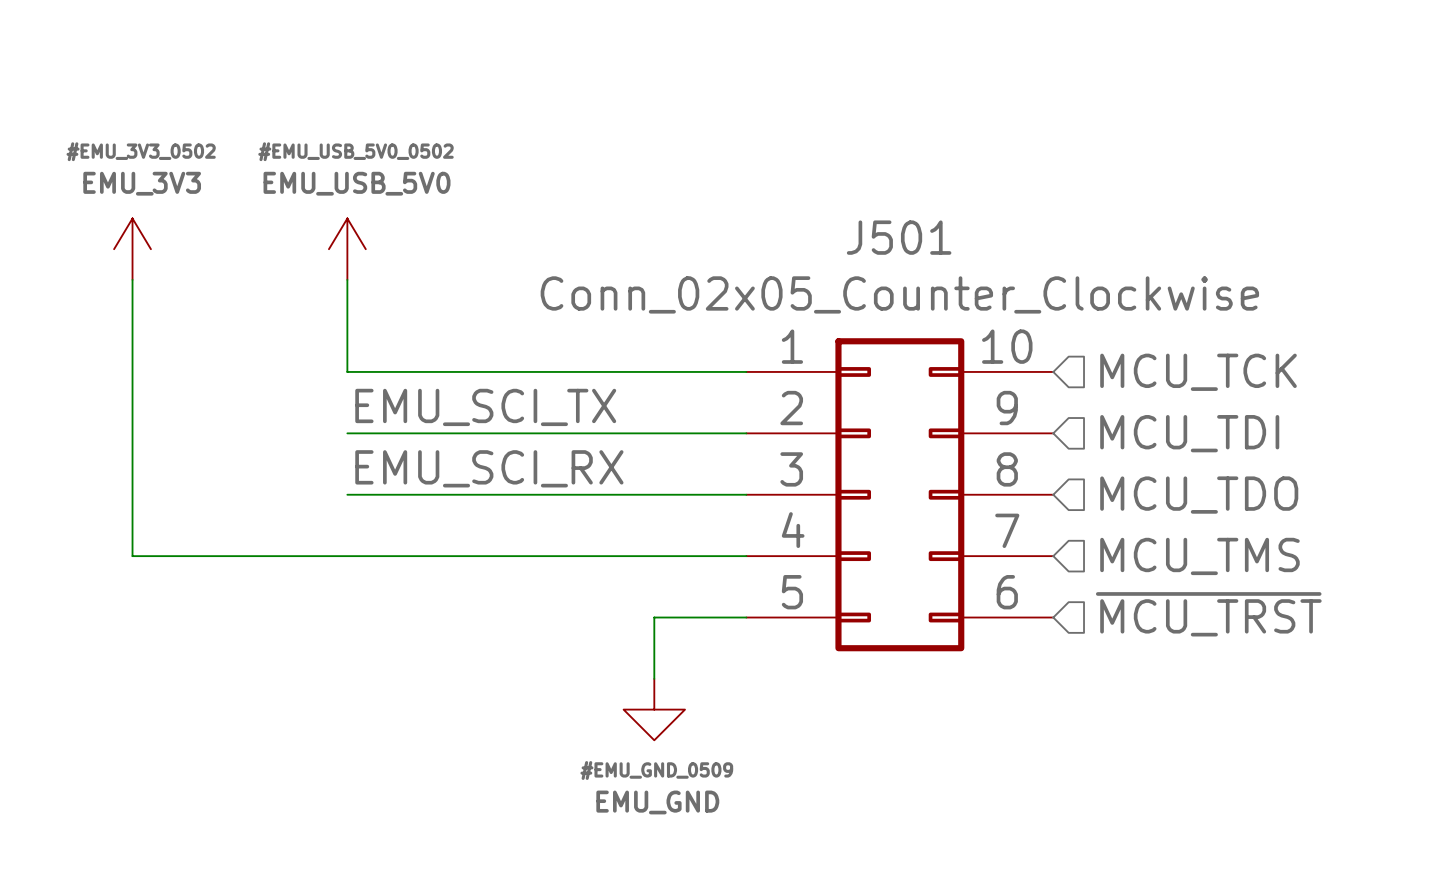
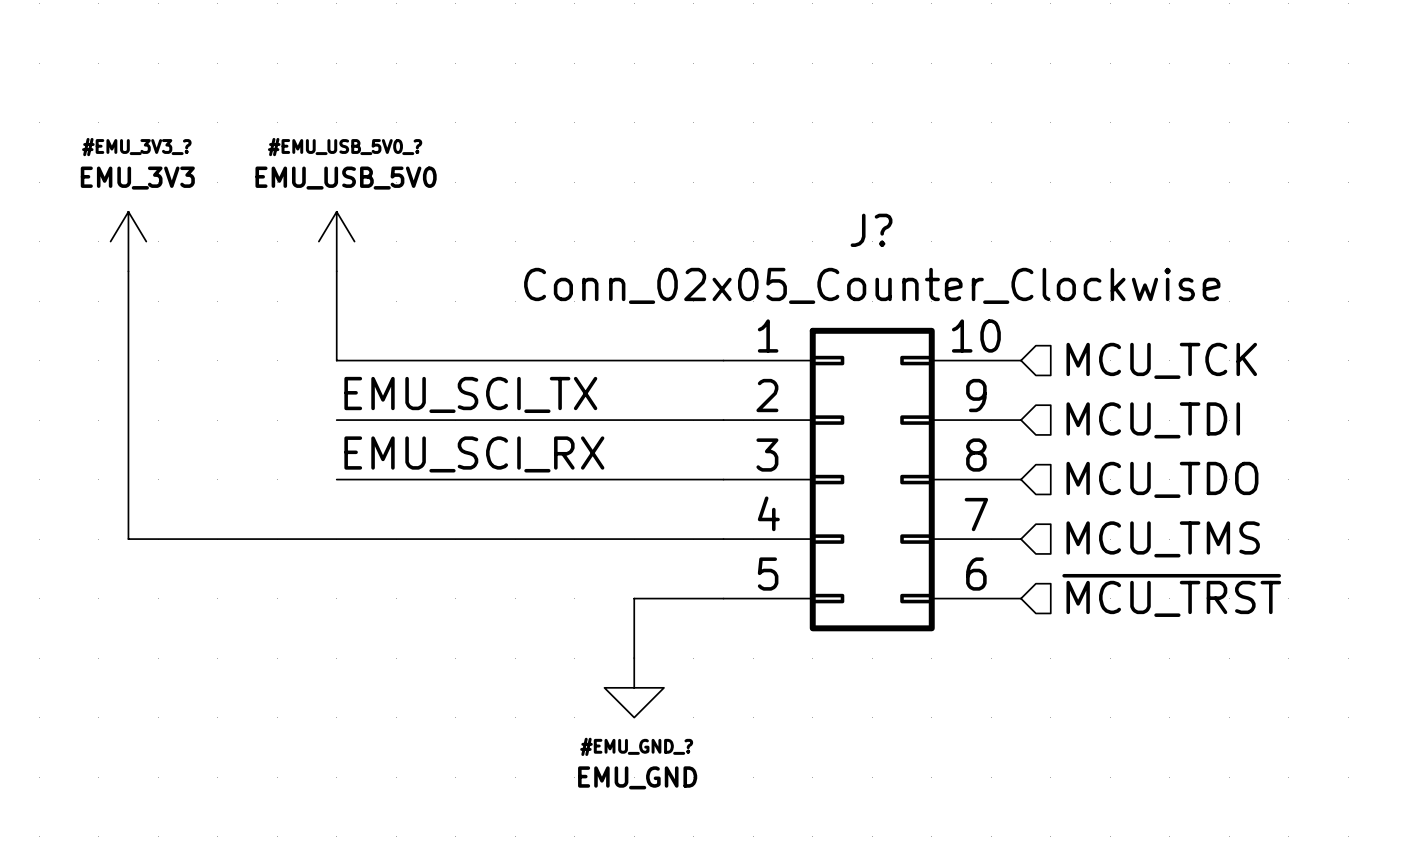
#EMU_3V3_0502 name: #EMU_3V3_0502 (141, 151) -> #EMU_3V3_? (136, 147)
#EMU_USB_5V0_0502 name: #EMU_USB_5V0_0502 (356, 151) -> #EMU_USB_5V0_? (345, 147)
J501 name: J501 (899, 237) -> J? (871, 230)
#EMU_GND_0509 name: #EMU_GND_0509 (656, 770) -> #EMU_GND_? (636, 746)

